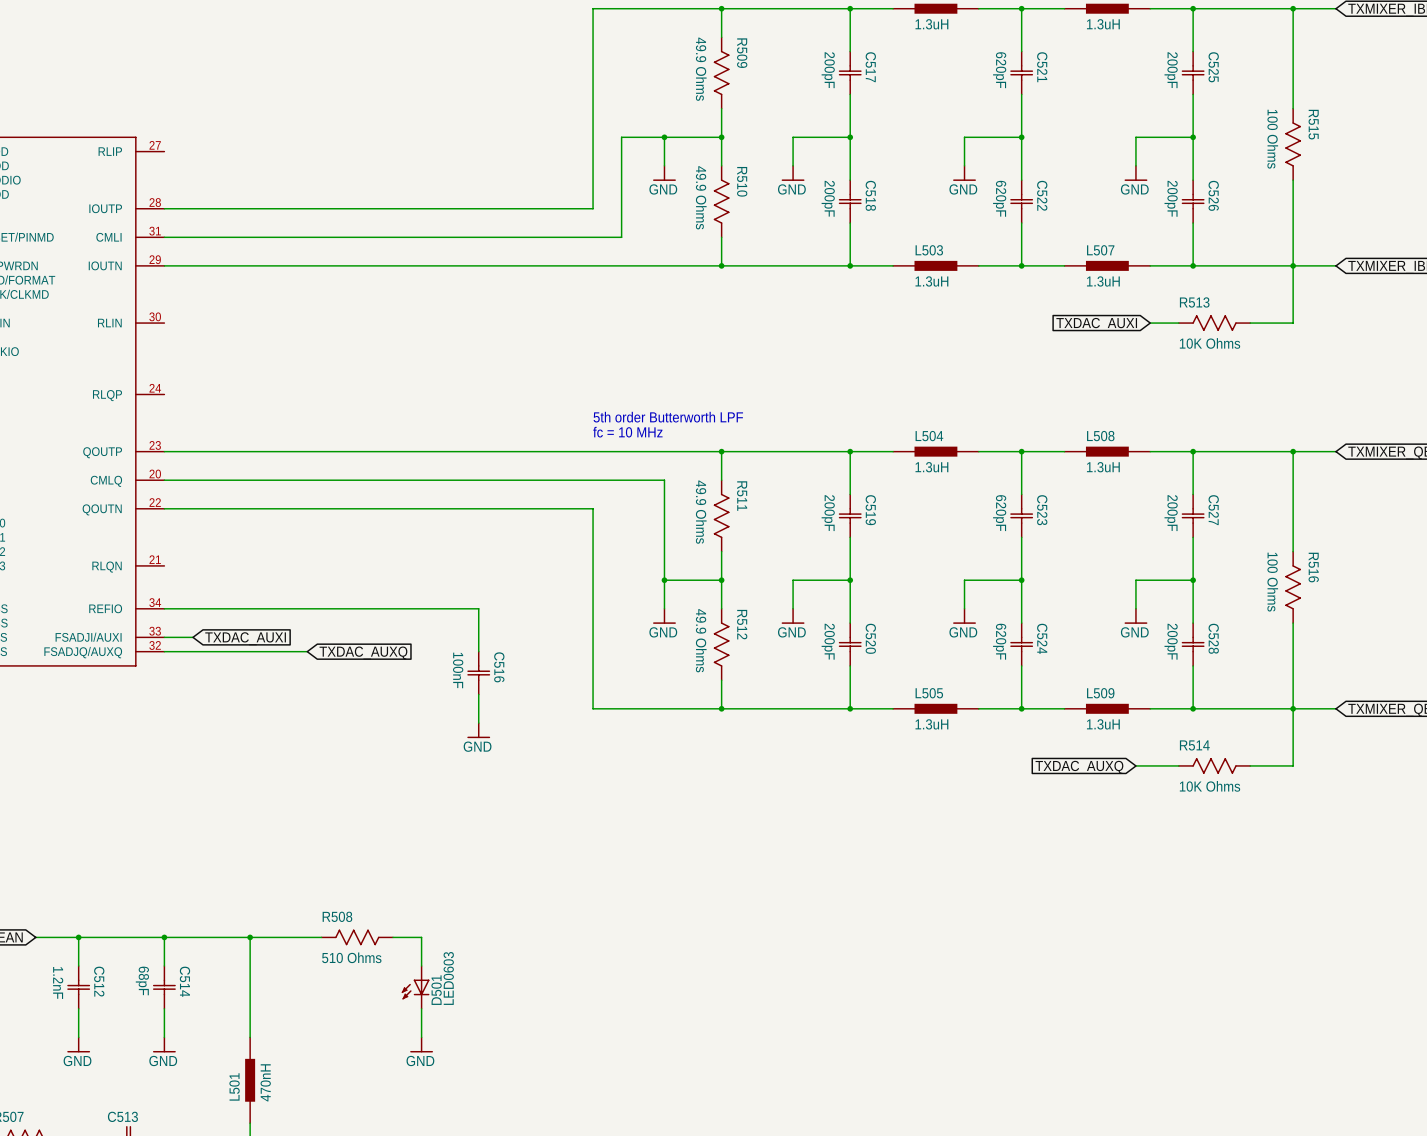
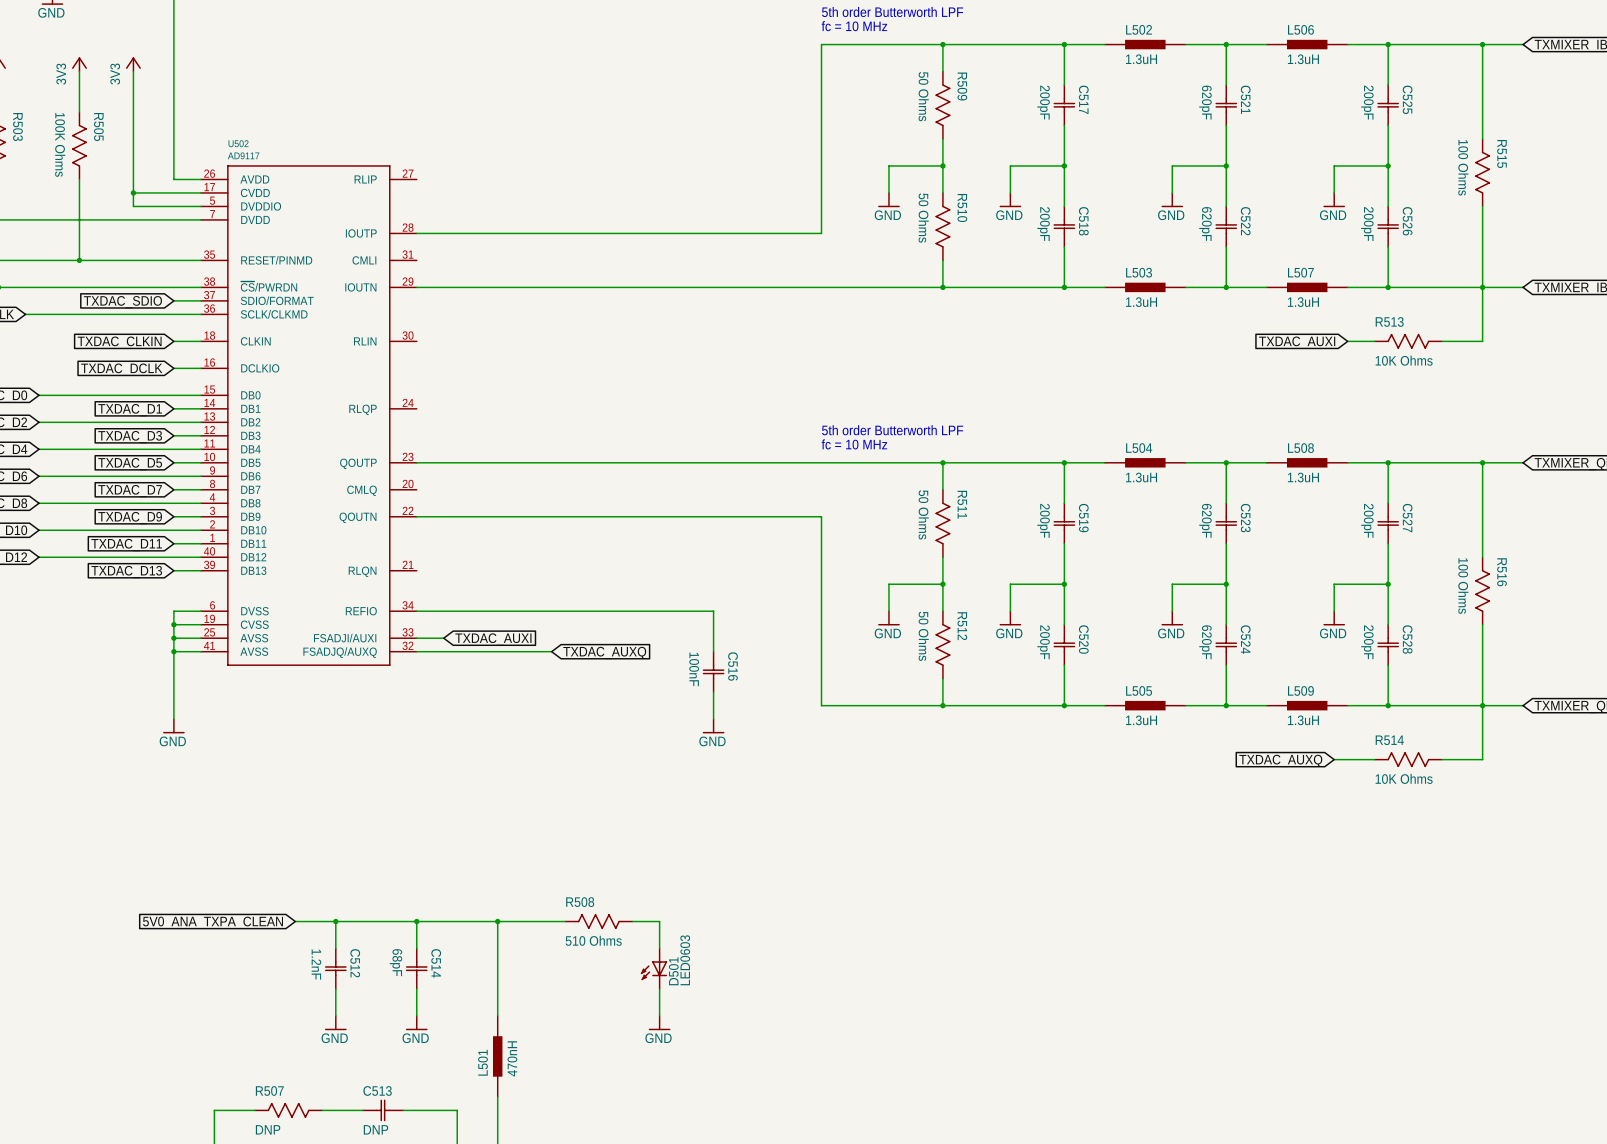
R509 value: 49.9 Ohms (701, 69) -> 50 Ohms (923, 96)
wire: (664, 137) (621, 137) (621, 237) (164, 237) -> none
junction: (664, 137) -> none
R510 value: 49.9 Ohms (701, 197) -> 50 Ohms (923, 218)
wire: (164, 480) (664, 480) (664, 580) -> none
R511 value: 49.9 Ohms (701, 512) -> 50 Ohms (923, 514)
junction: (664, 580) -> none
R512 value: 49.9 Ohms (701, 640) -> 50 Ohms (923, 636)

